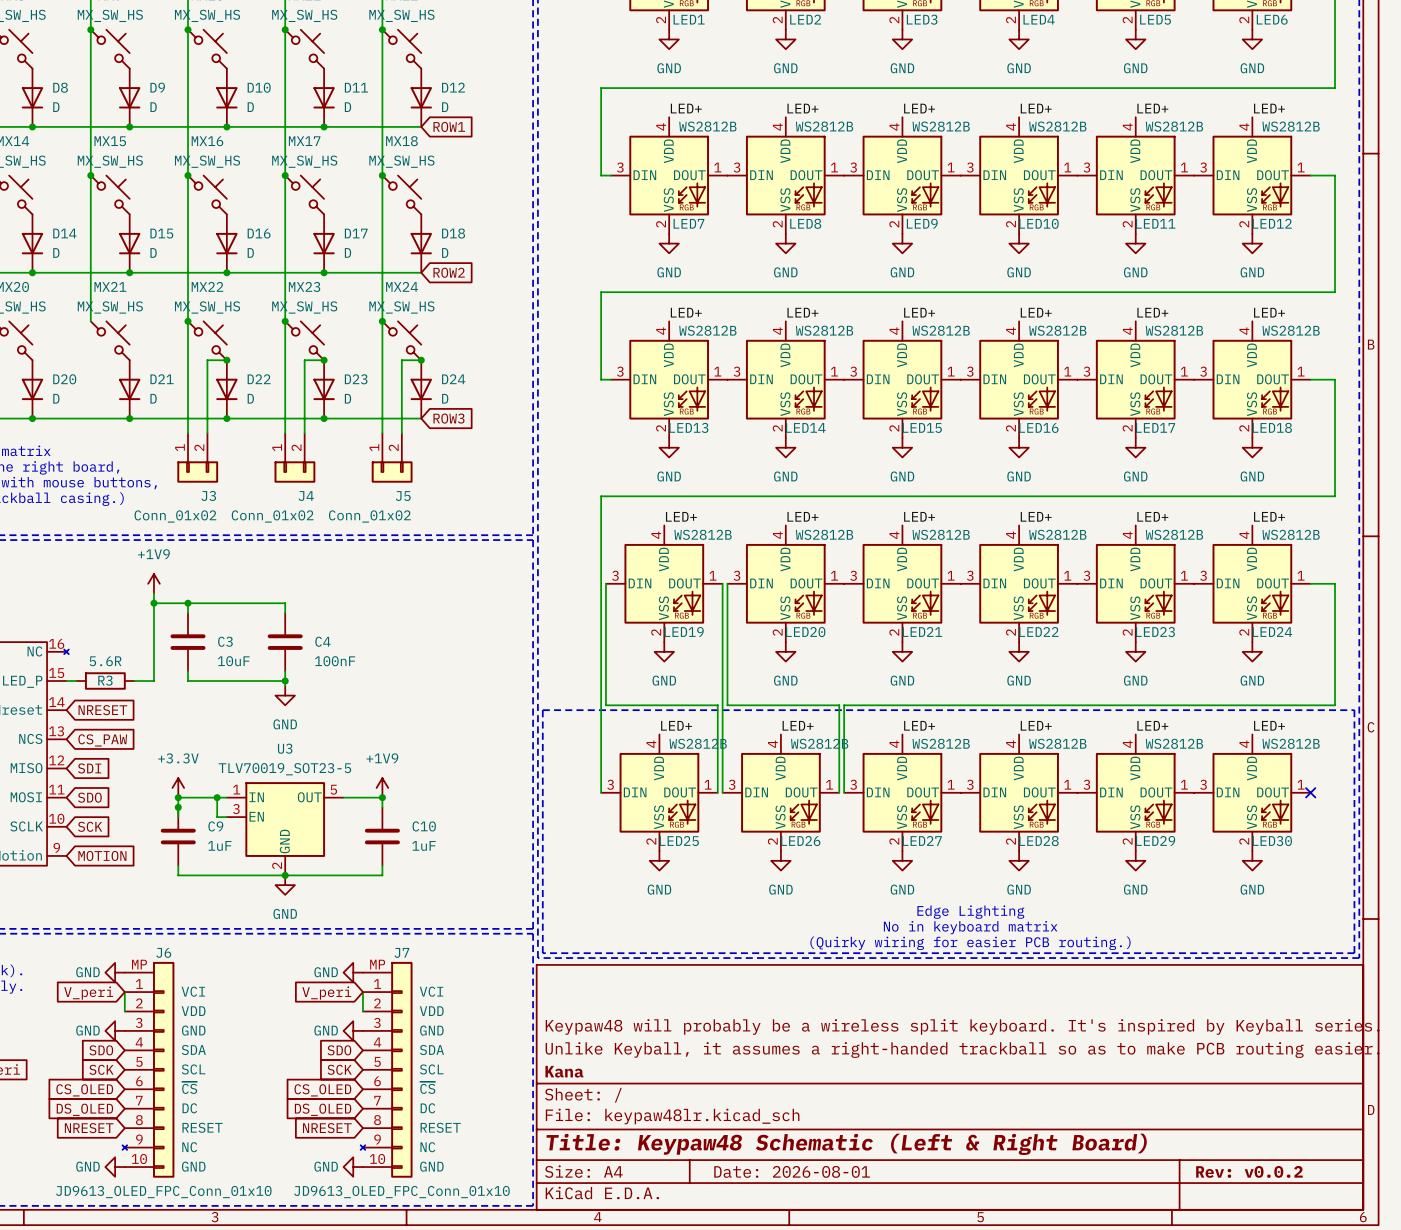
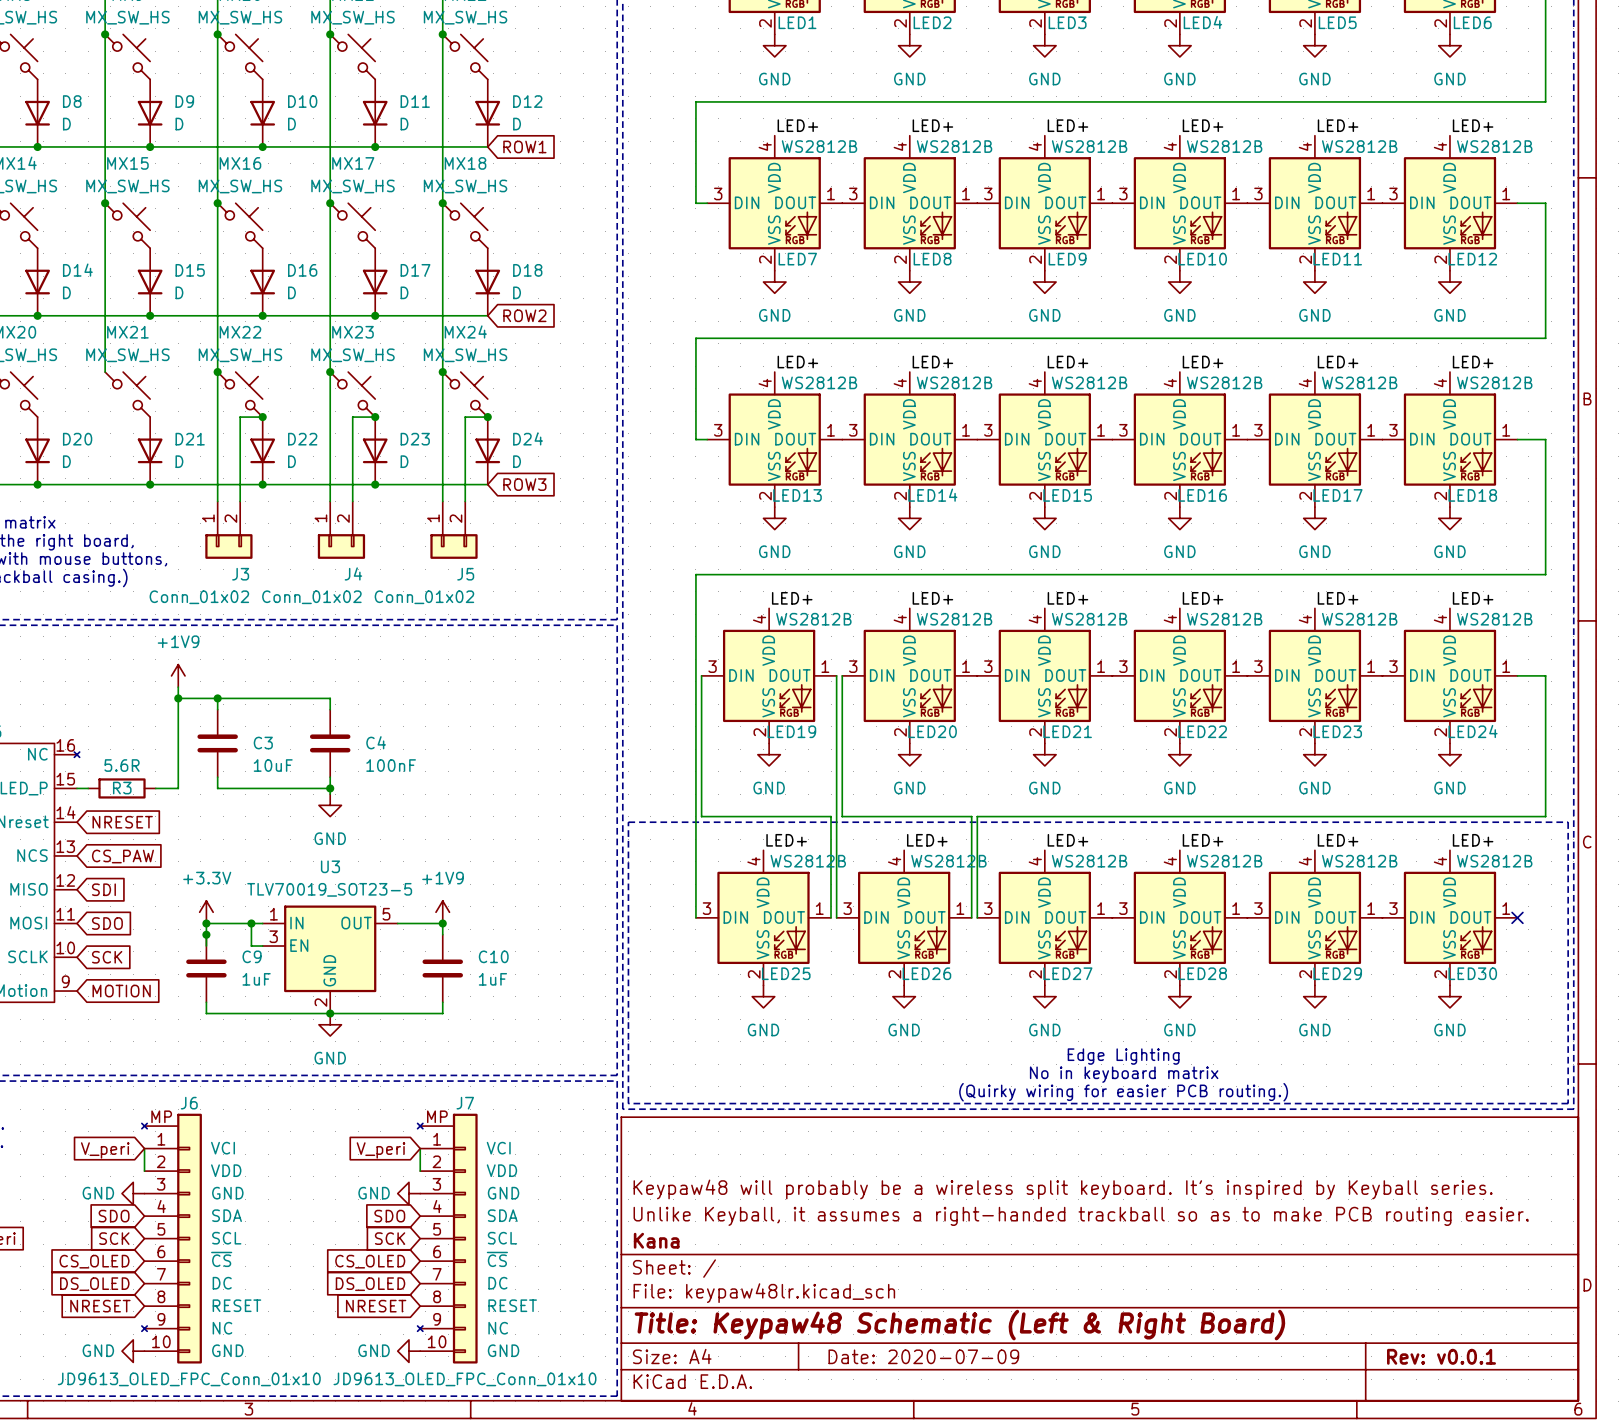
J6 symbol: [122, 961, 175, 1178] -> [141, 1113, 202, 1364]
J7 symbol: [360, 961, 413, 1178] -> [417, 1113, 478, 1364]
power symbol: GND (115, 972) -> none
power symbol: GND (353, 972) -> none
title block: Date: 2026-08-01 (792, 1171) -> Date: 2020-07-09 (923, 1356)
title block: Rev: v0.0.2 (1249, 1171) -> Rev: v0.0.1 (1441, 1356)

